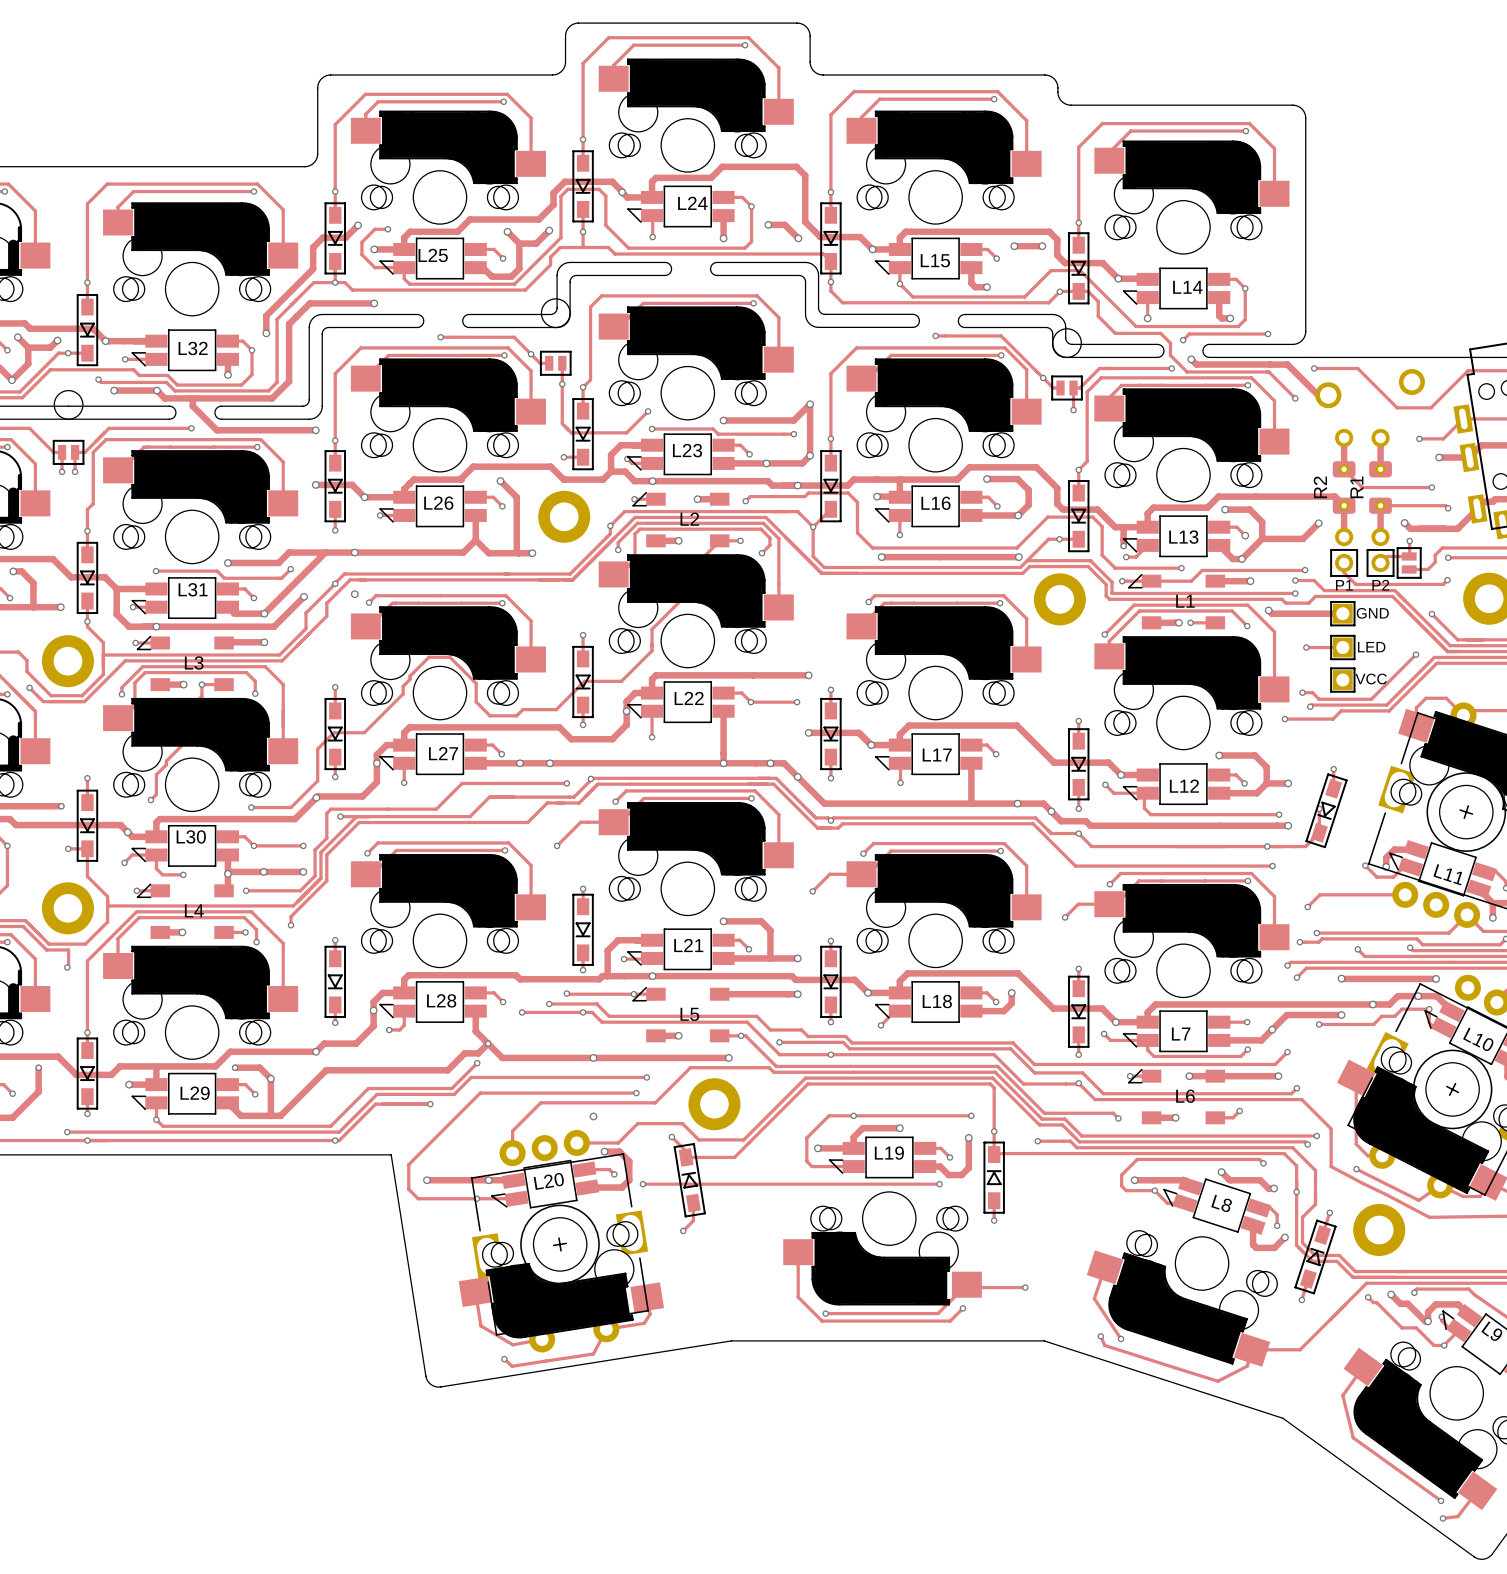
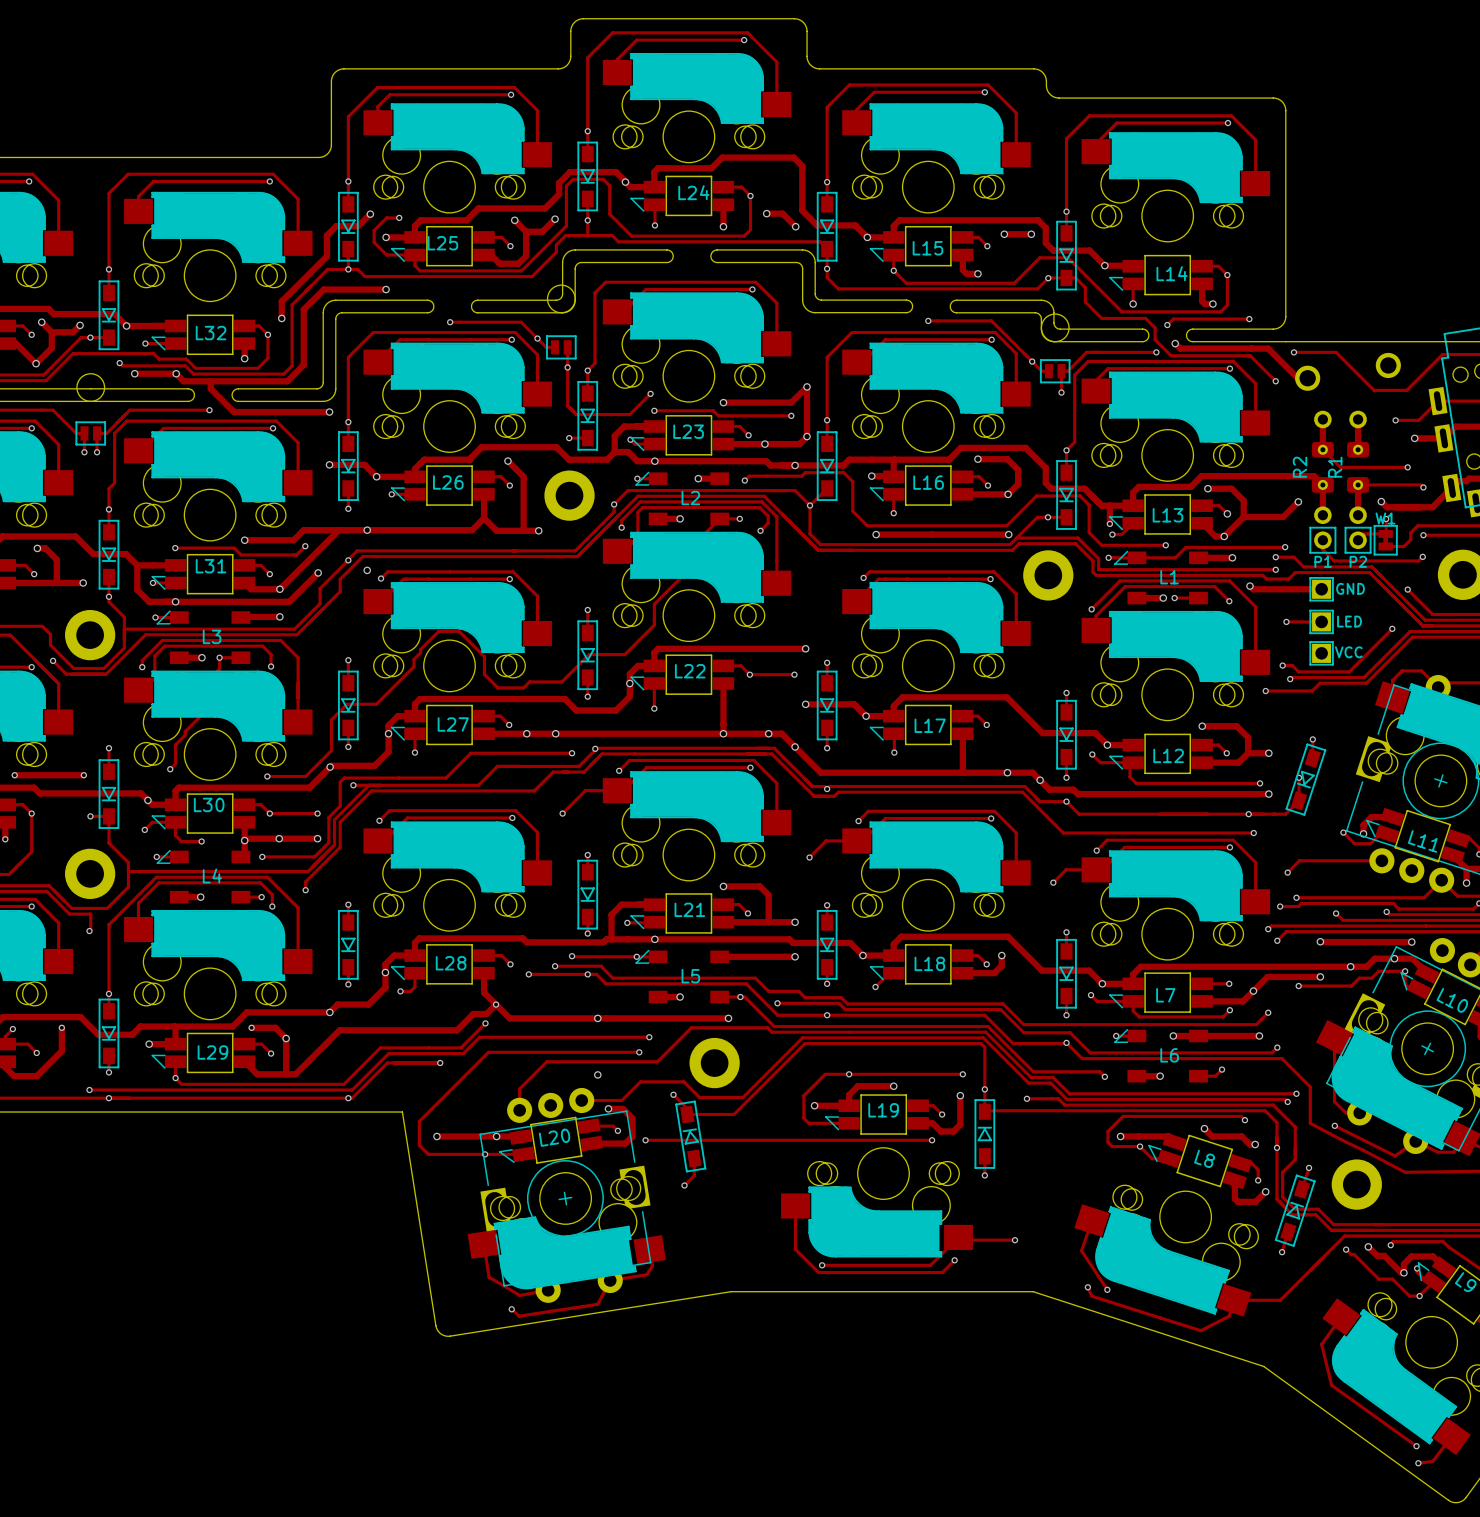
part: (1409, 562) -> none
W1: none -> (1385, 540)

